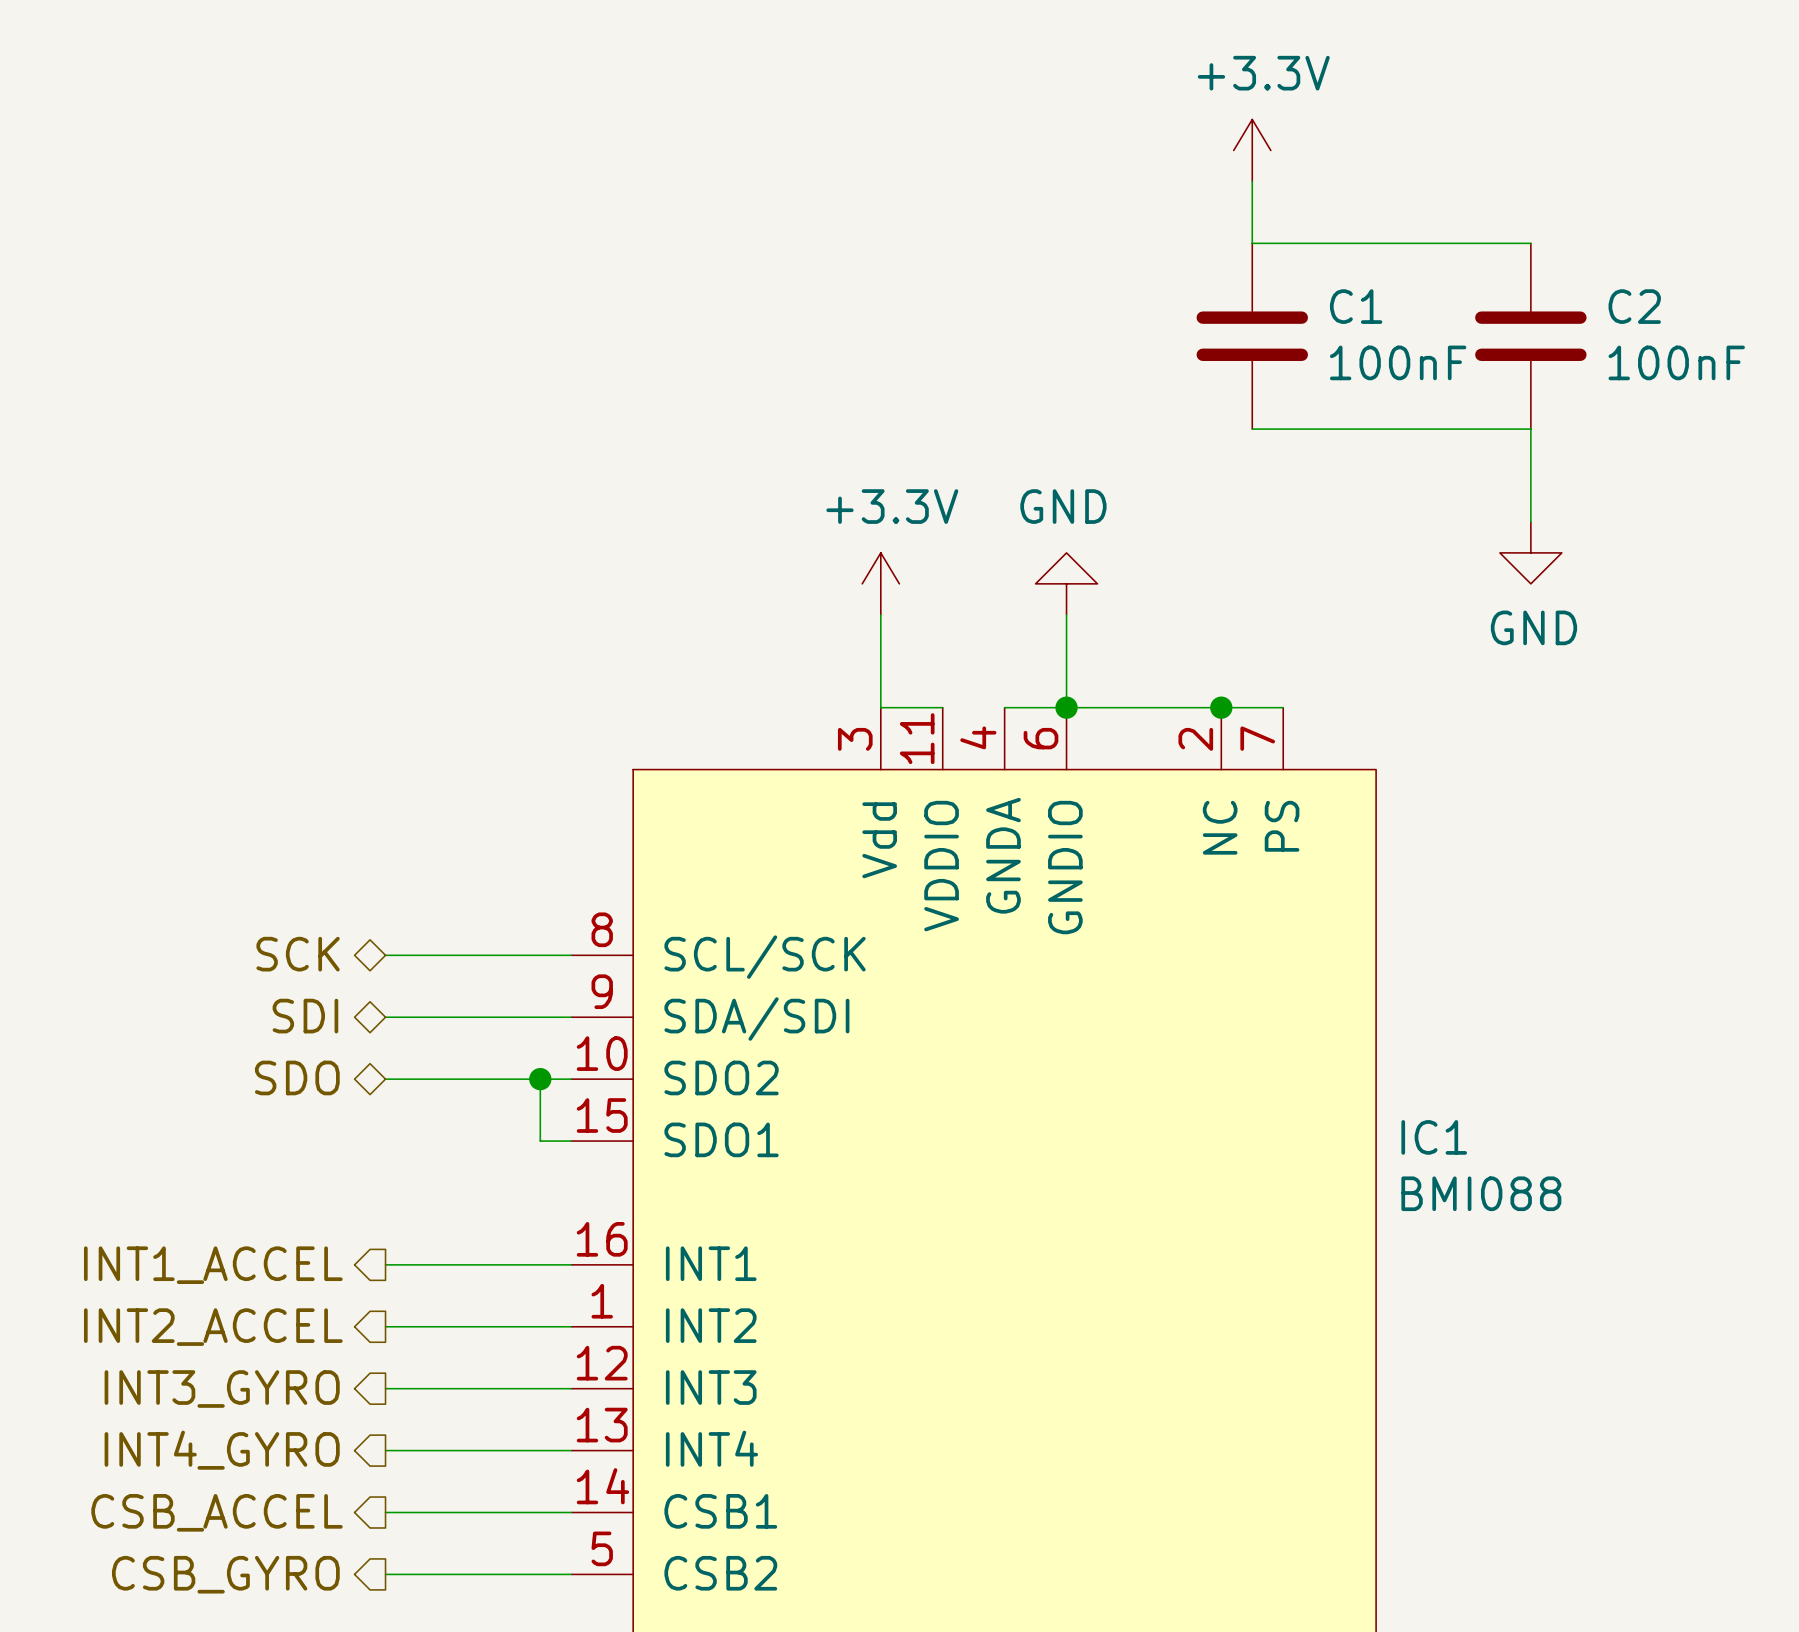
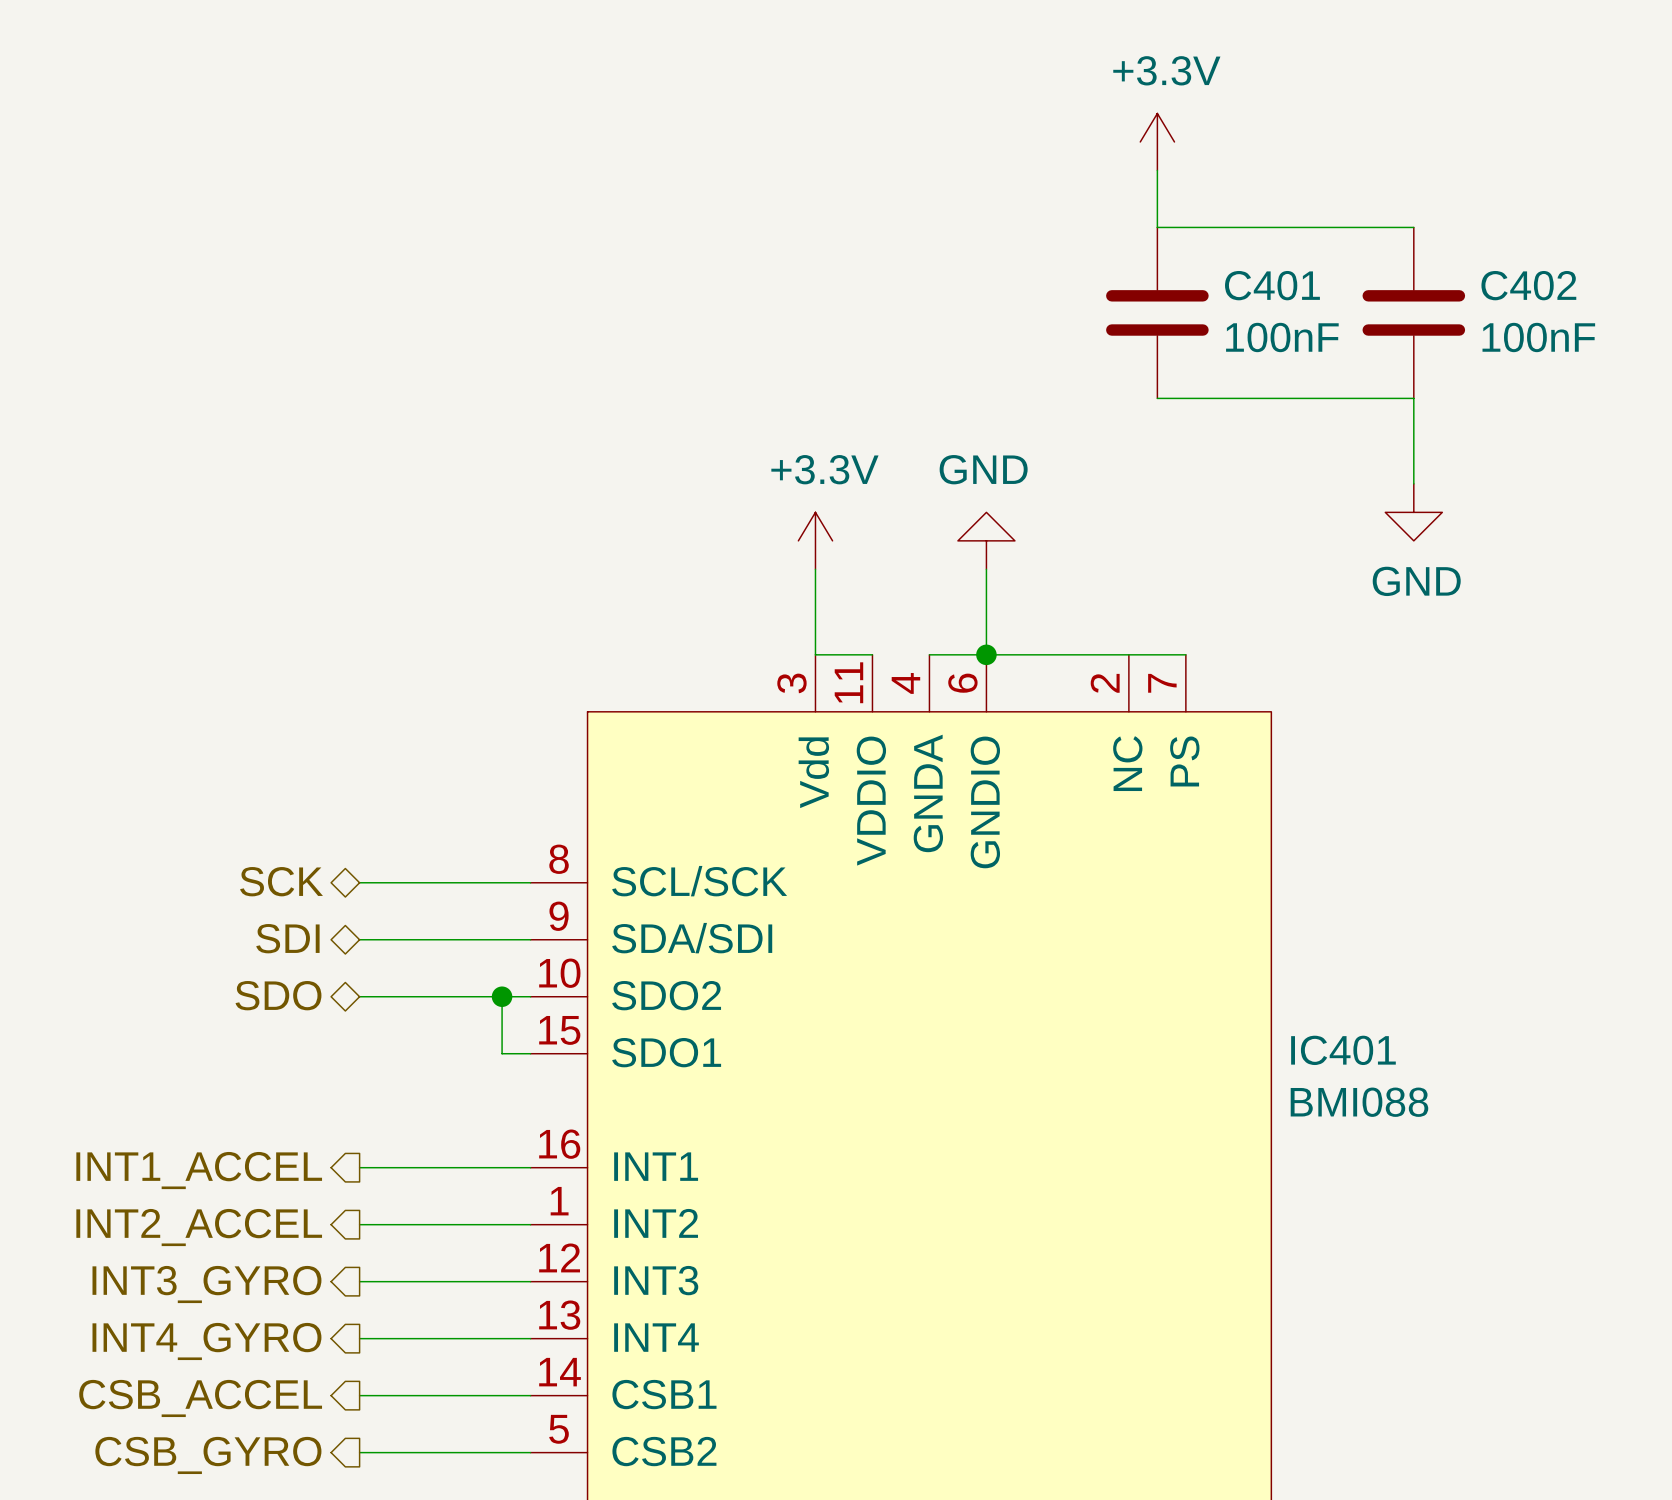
C1 name: C1 (1356, 306) -> C401 (1272, 285)
C2 name: C2 (1634, 306) -> C402 (1528, 285)
junction: (1221, 707) -> none
IC1 name: IC1 (1434, 1137) -> IC401 (1343, 1050)

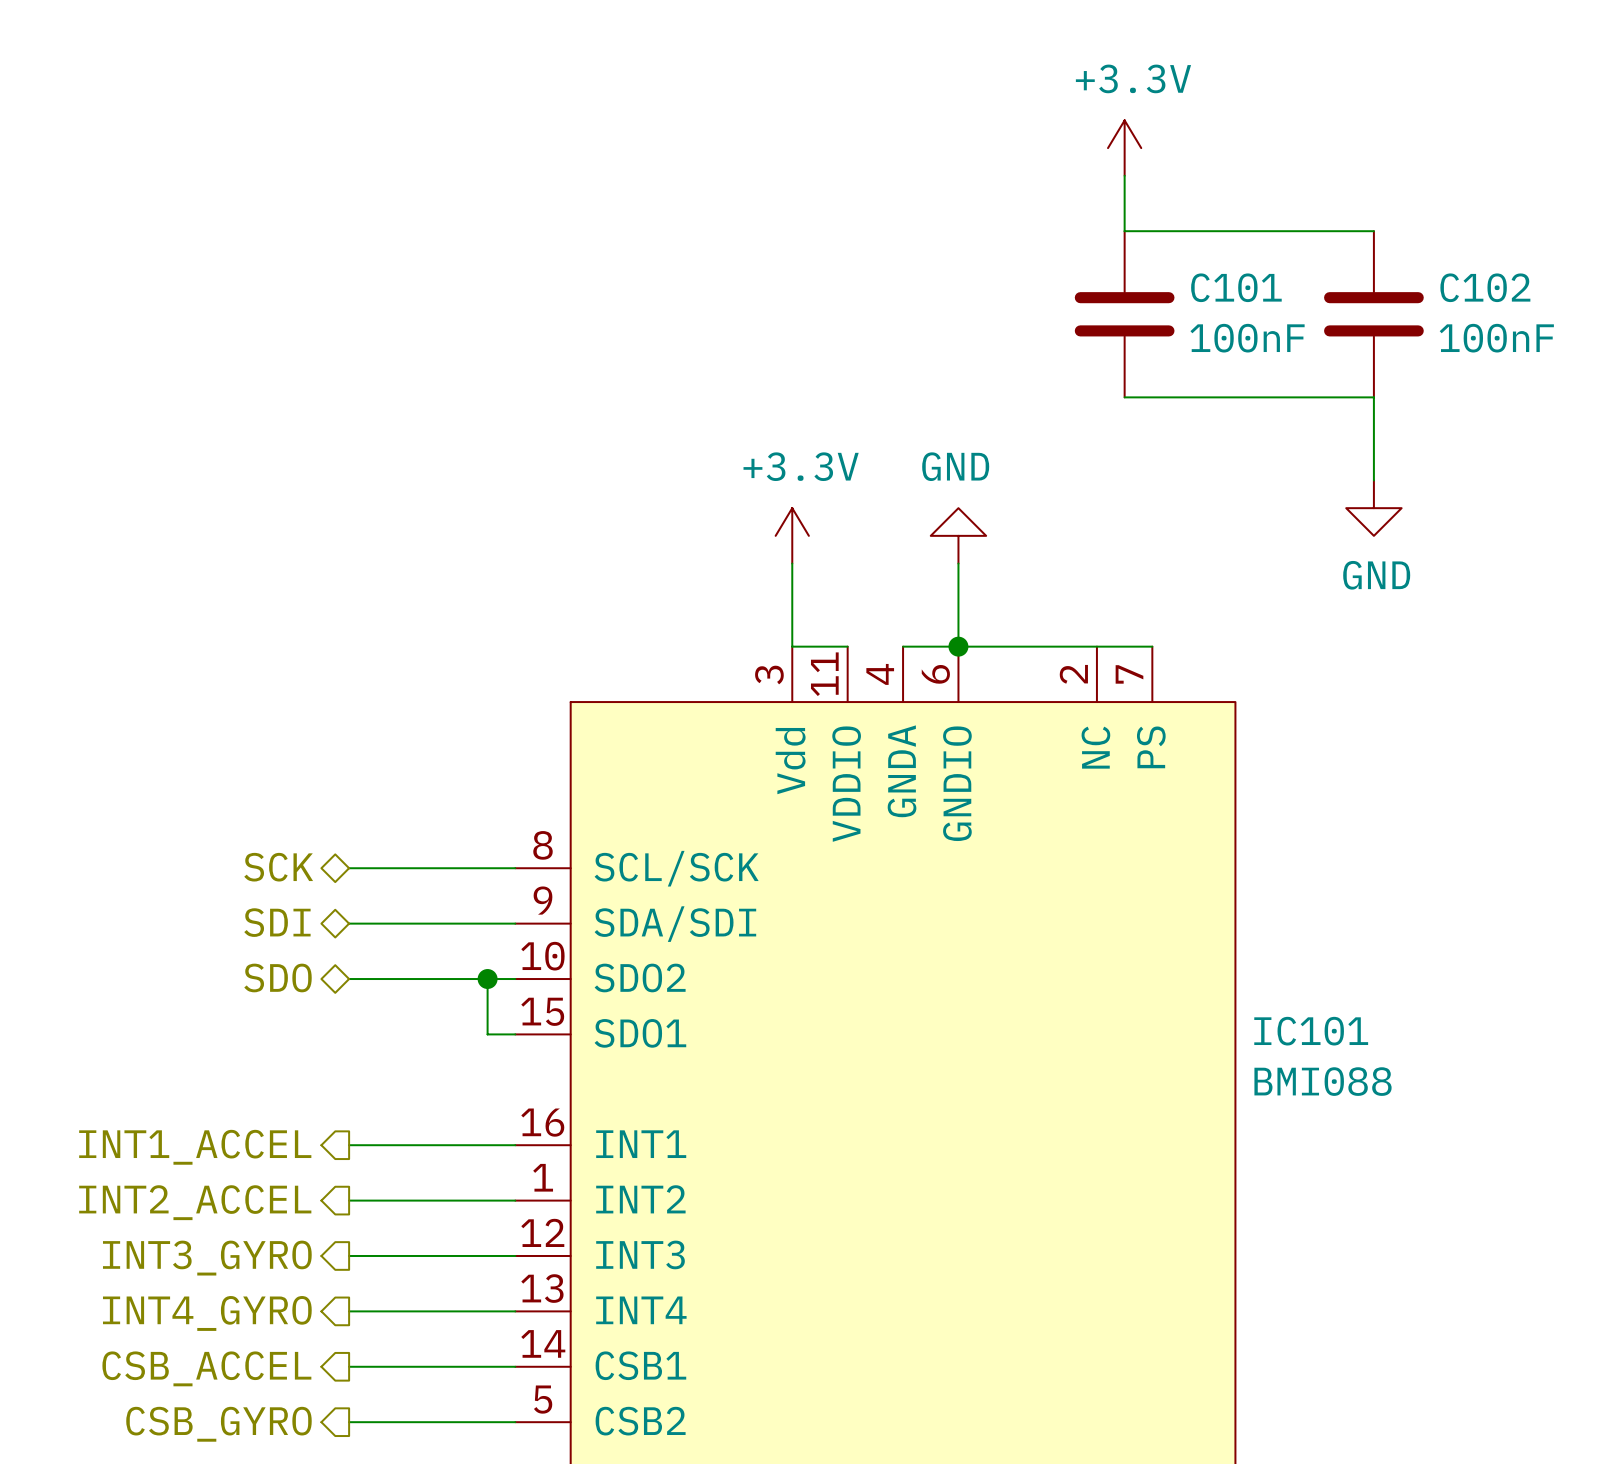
C401 name: C401 (1272, 285) -> C101 (1236, 287)
C402 name: C402 (1528, 285) -> C102 (1485, 287)
IC401 name: IC401 (1343, 1050) -> IC101 (1311, 1031)

